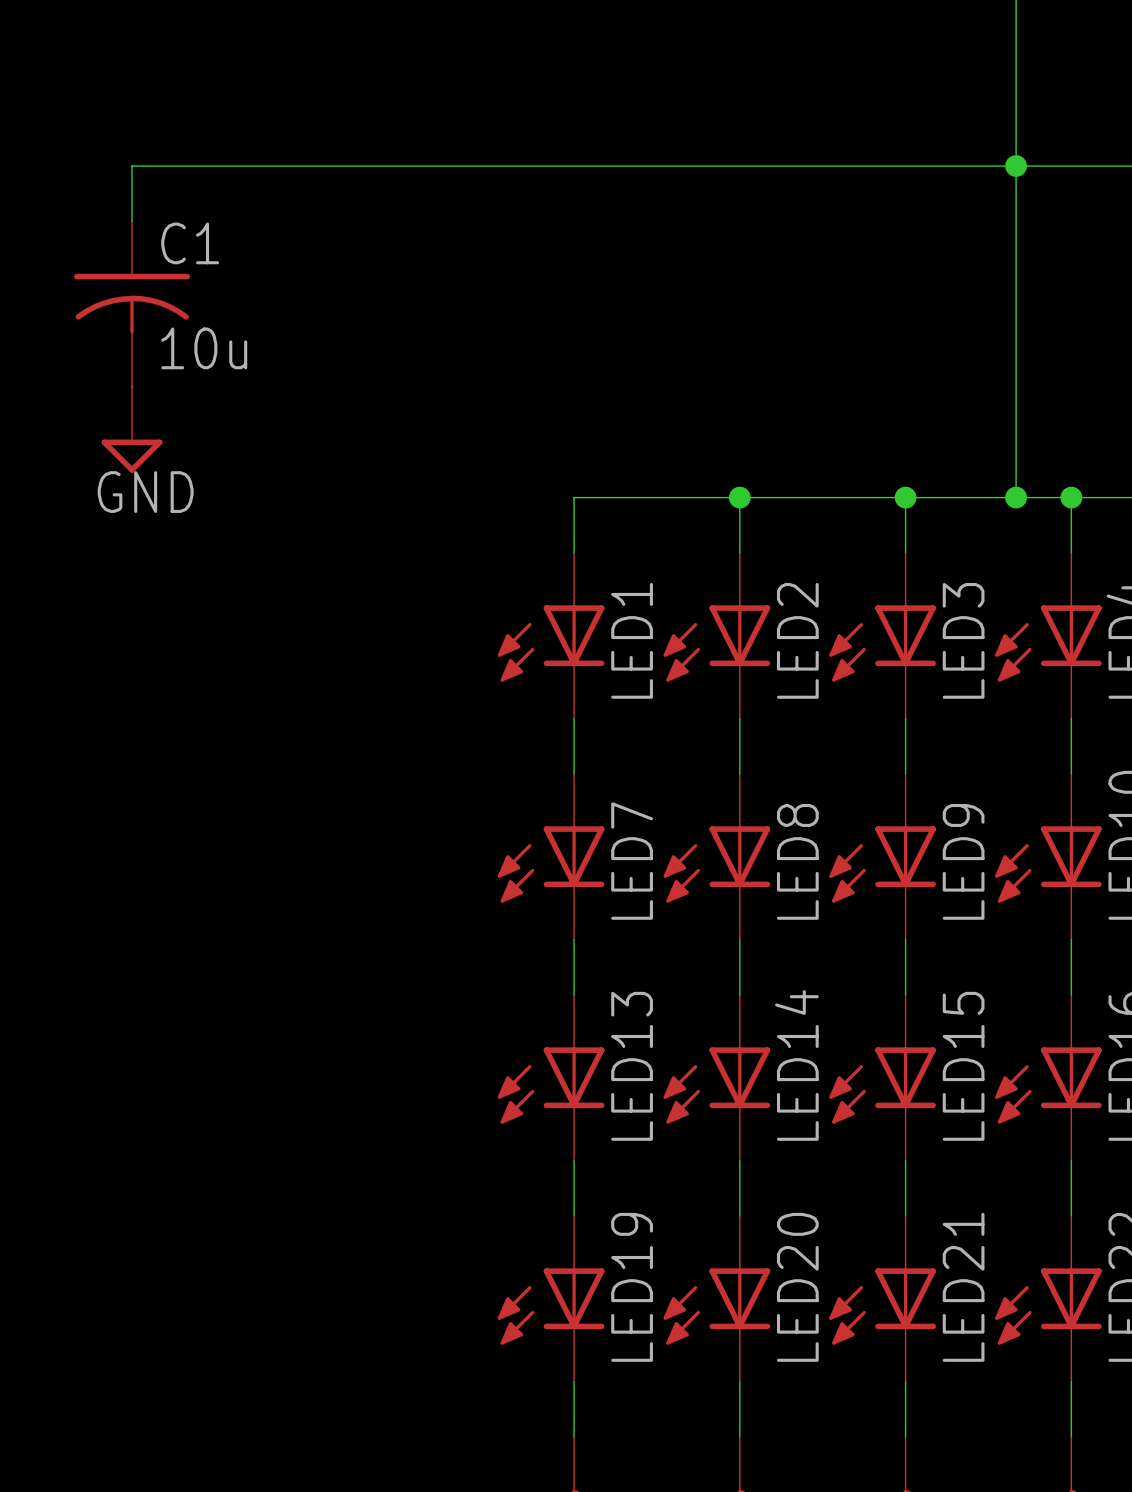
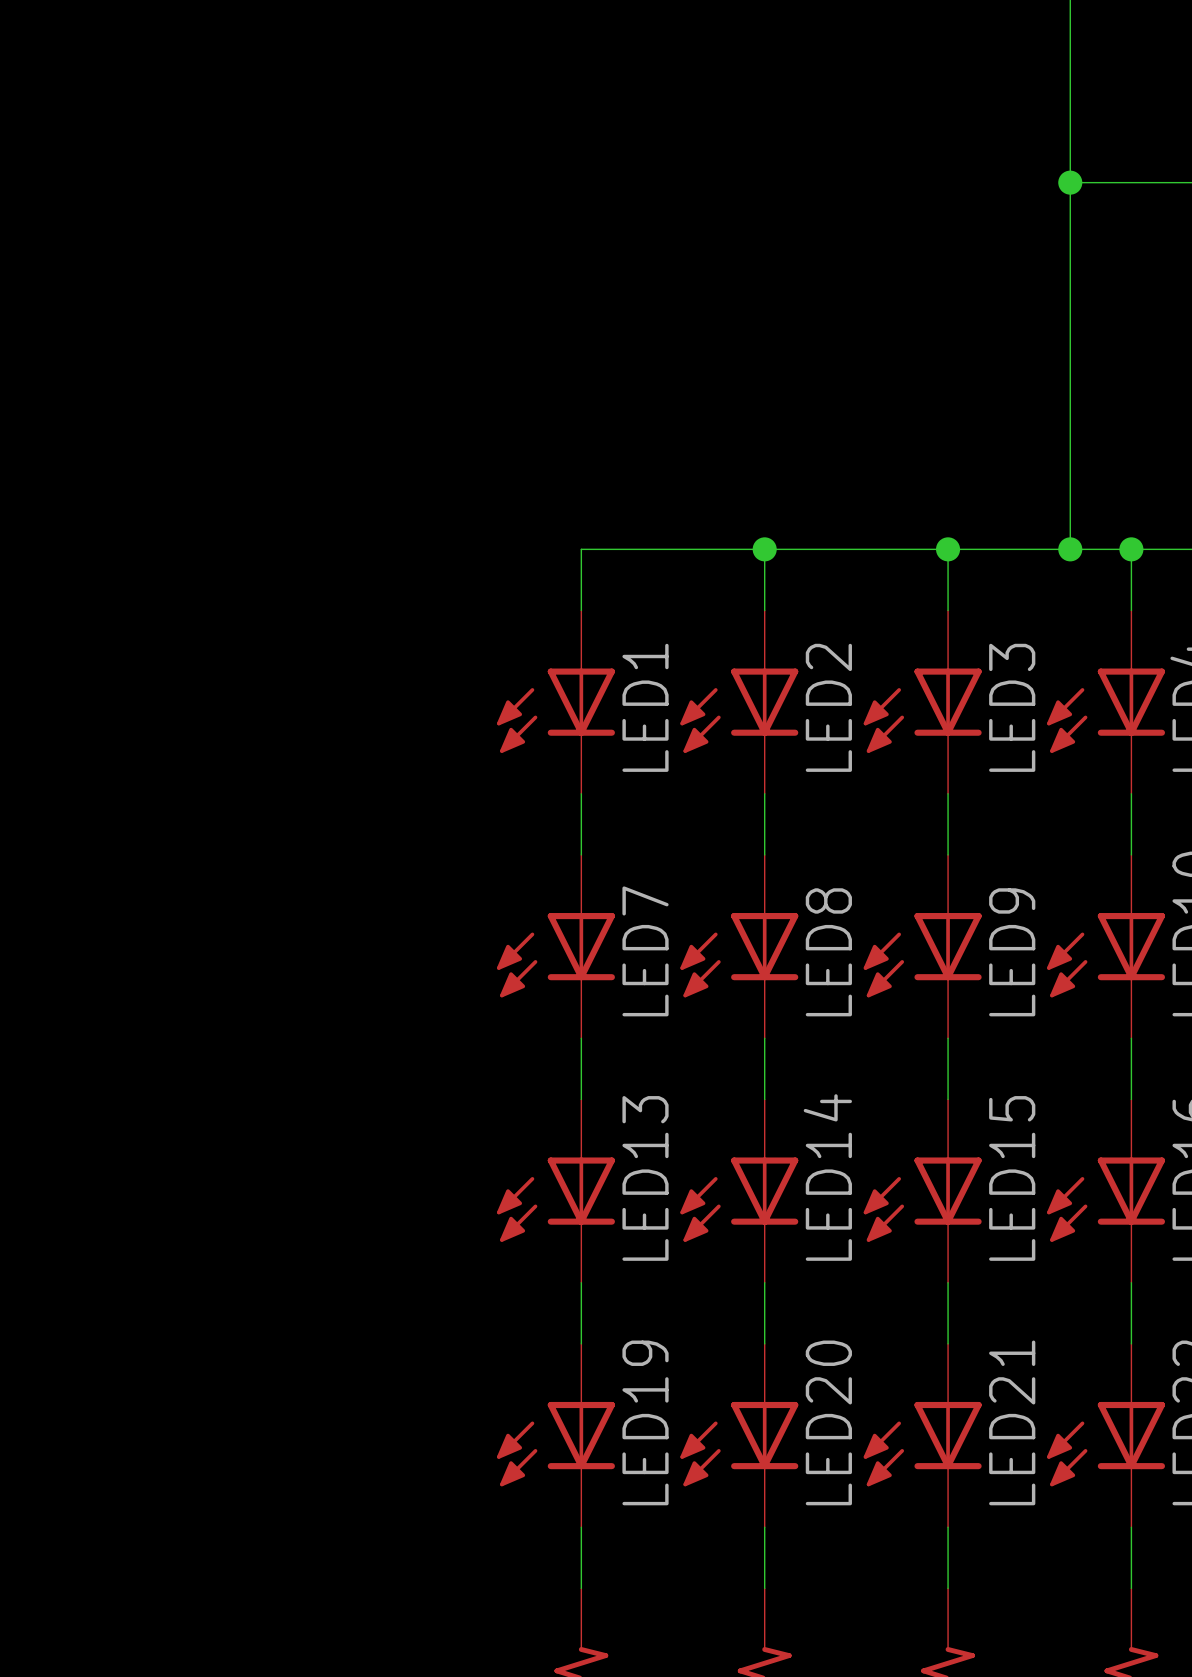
wire: (1016, 166) (132, 166) (132, 221) -> none
C1: 10u (132, 304) -> none
power symbol: GND (132, 429) -> none

